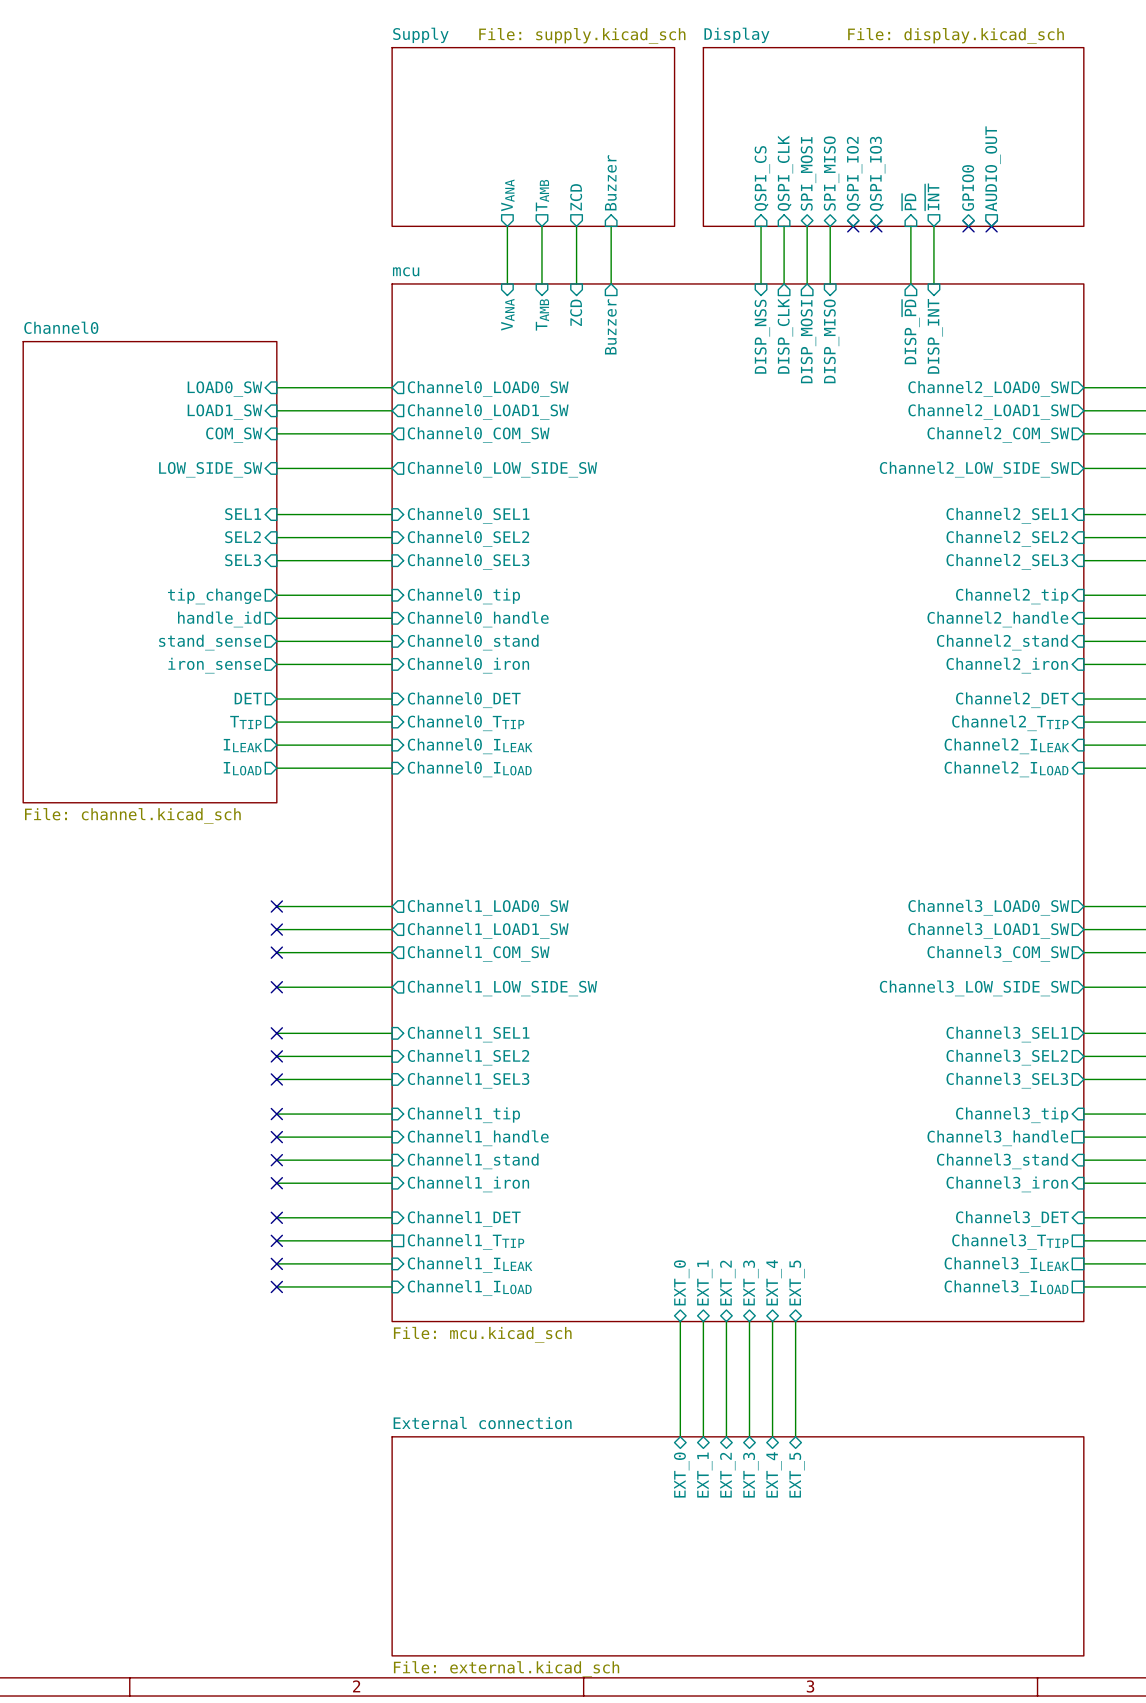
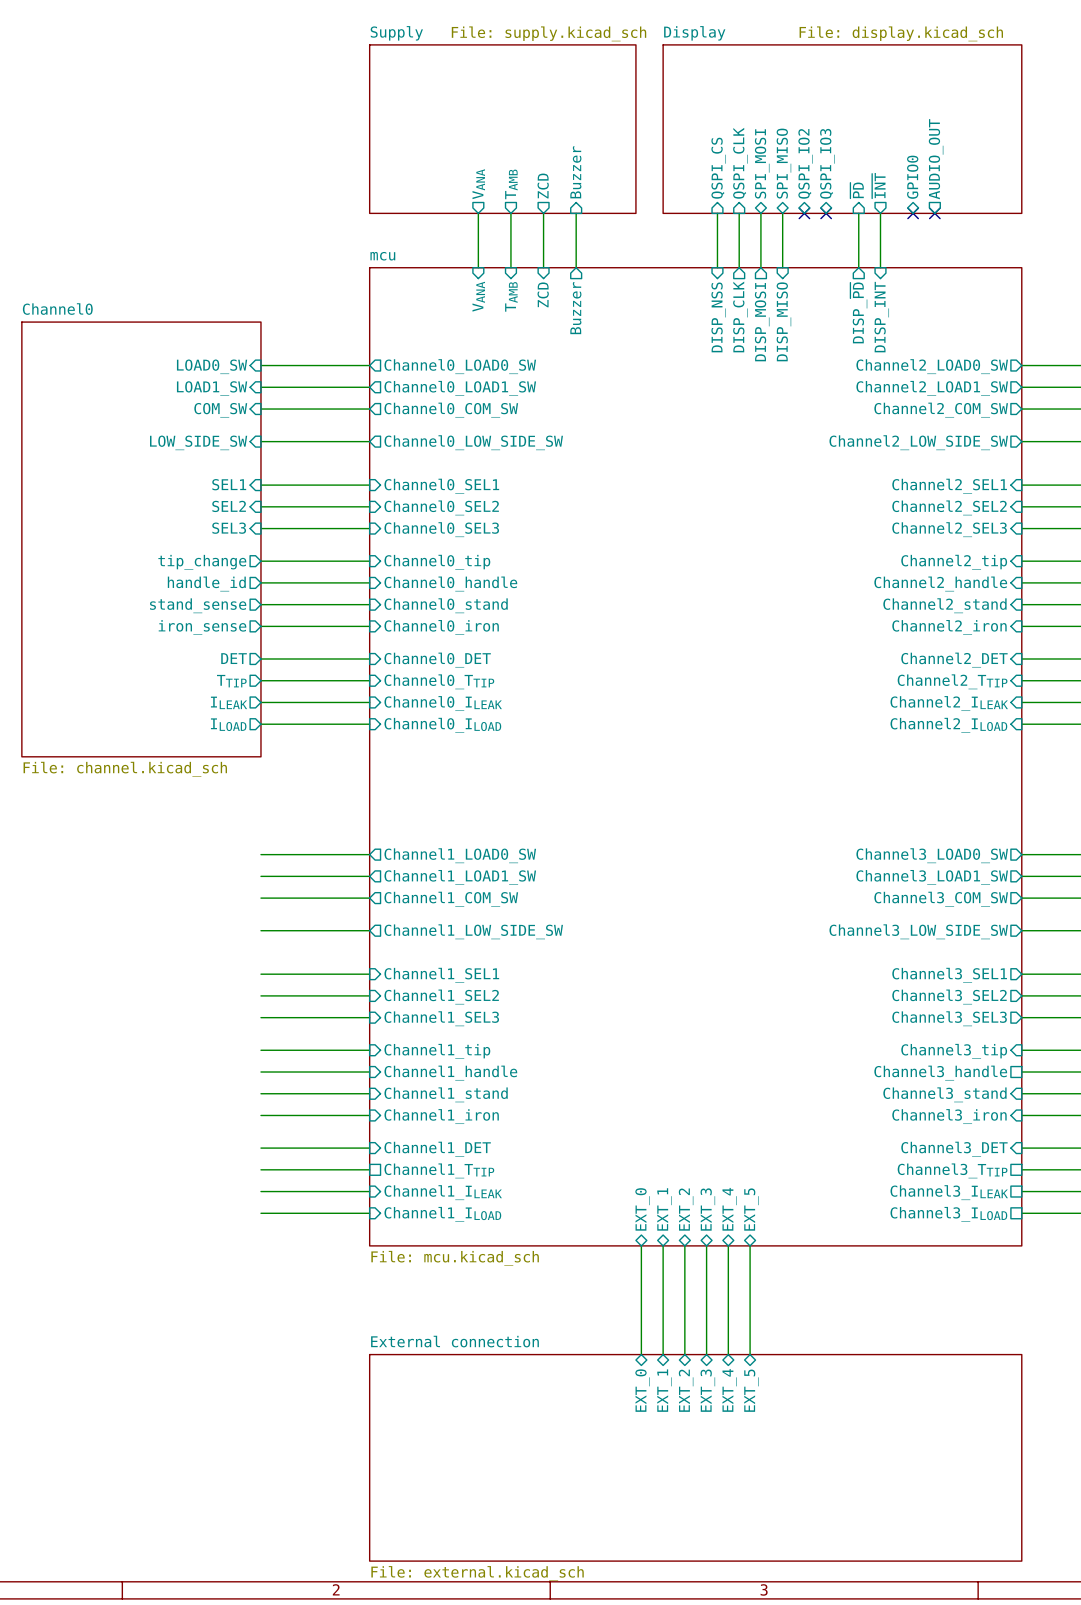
no-connect mark: (276, 906) -> none
no-connect mark: (276, 929) -> none
no-connect mark: (276, 952) -> none
no-connect mark: (276, 987) -> none
no-connect mark: (276, 1033) -> none
no-connect mark: (276, 1056) -> none
no-connect mark: (276, 1079) -> none
no-connect mark: (276, 1114) -> none
no-connect mark: (276, 1137) -> none
no-connect mark: (276, 1160) -> none
no-connect mark: (276, 1183) -> none
no-connect mark: (276, 1217) -> none
no-connect mark: (276, 1240) -> none
no-connect mark: (276, 1263) -> none
no-connect mark: (276, 1286) -> none

